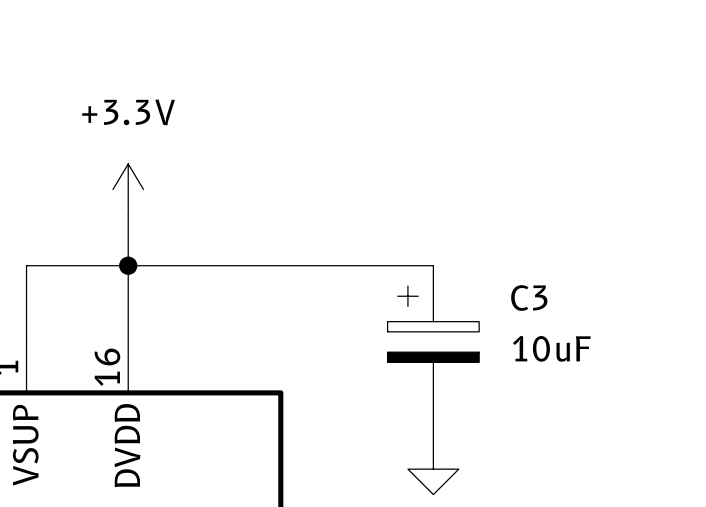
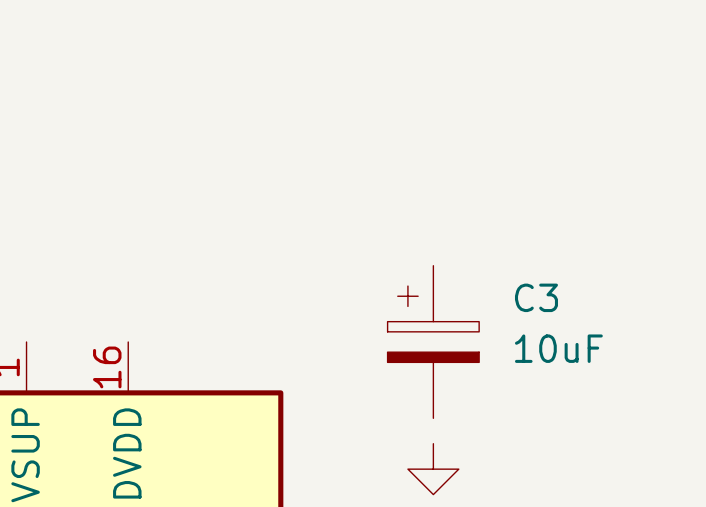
power symbol: +3.3V (128, 189) -> none
wire: (128, 214) (128, 342) -> none
junction: (128, 265) -> none
wire: (433, 265) (26, 265) (26, 342) -> none
wire: (433, 418) (433, 443) -> none

